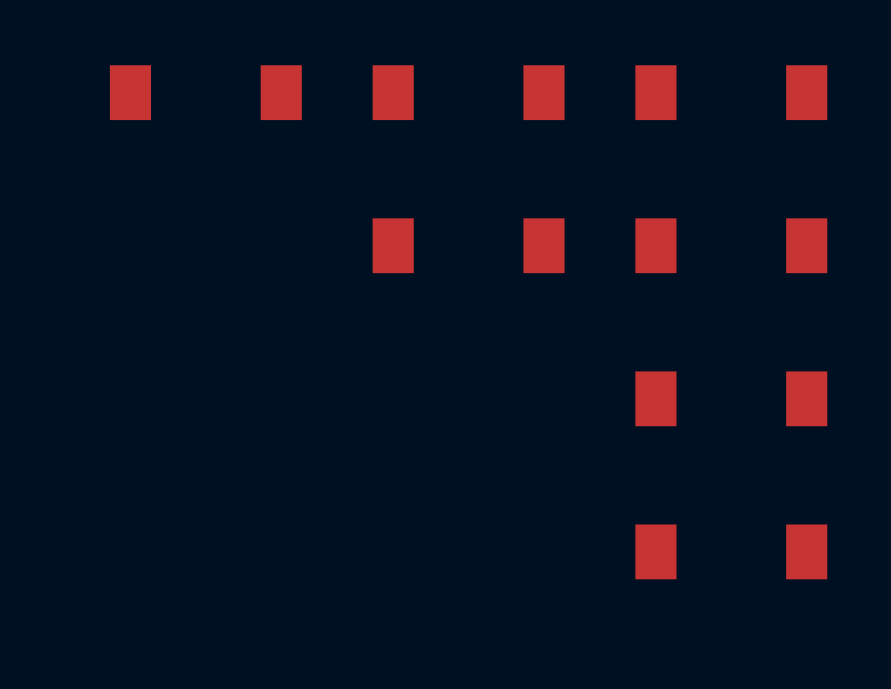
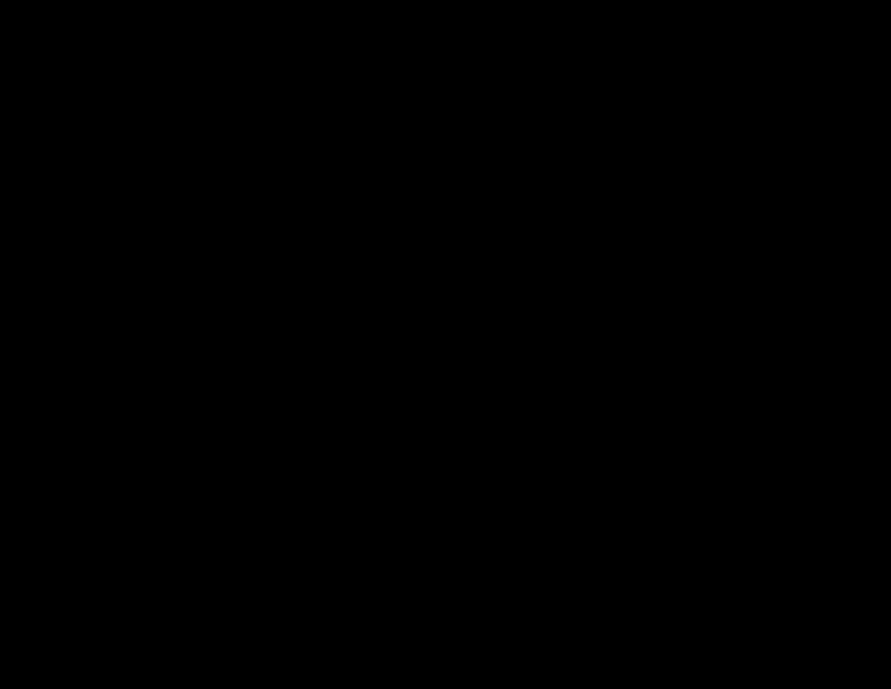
part: (205, 92) -> none
part: (468, 92) -> none
part: (731, 92) -> none
part: (468, 245) -> none
part: (731, 245) -> none
part: (731, 398) -> none
part: (731, 551) -> none

